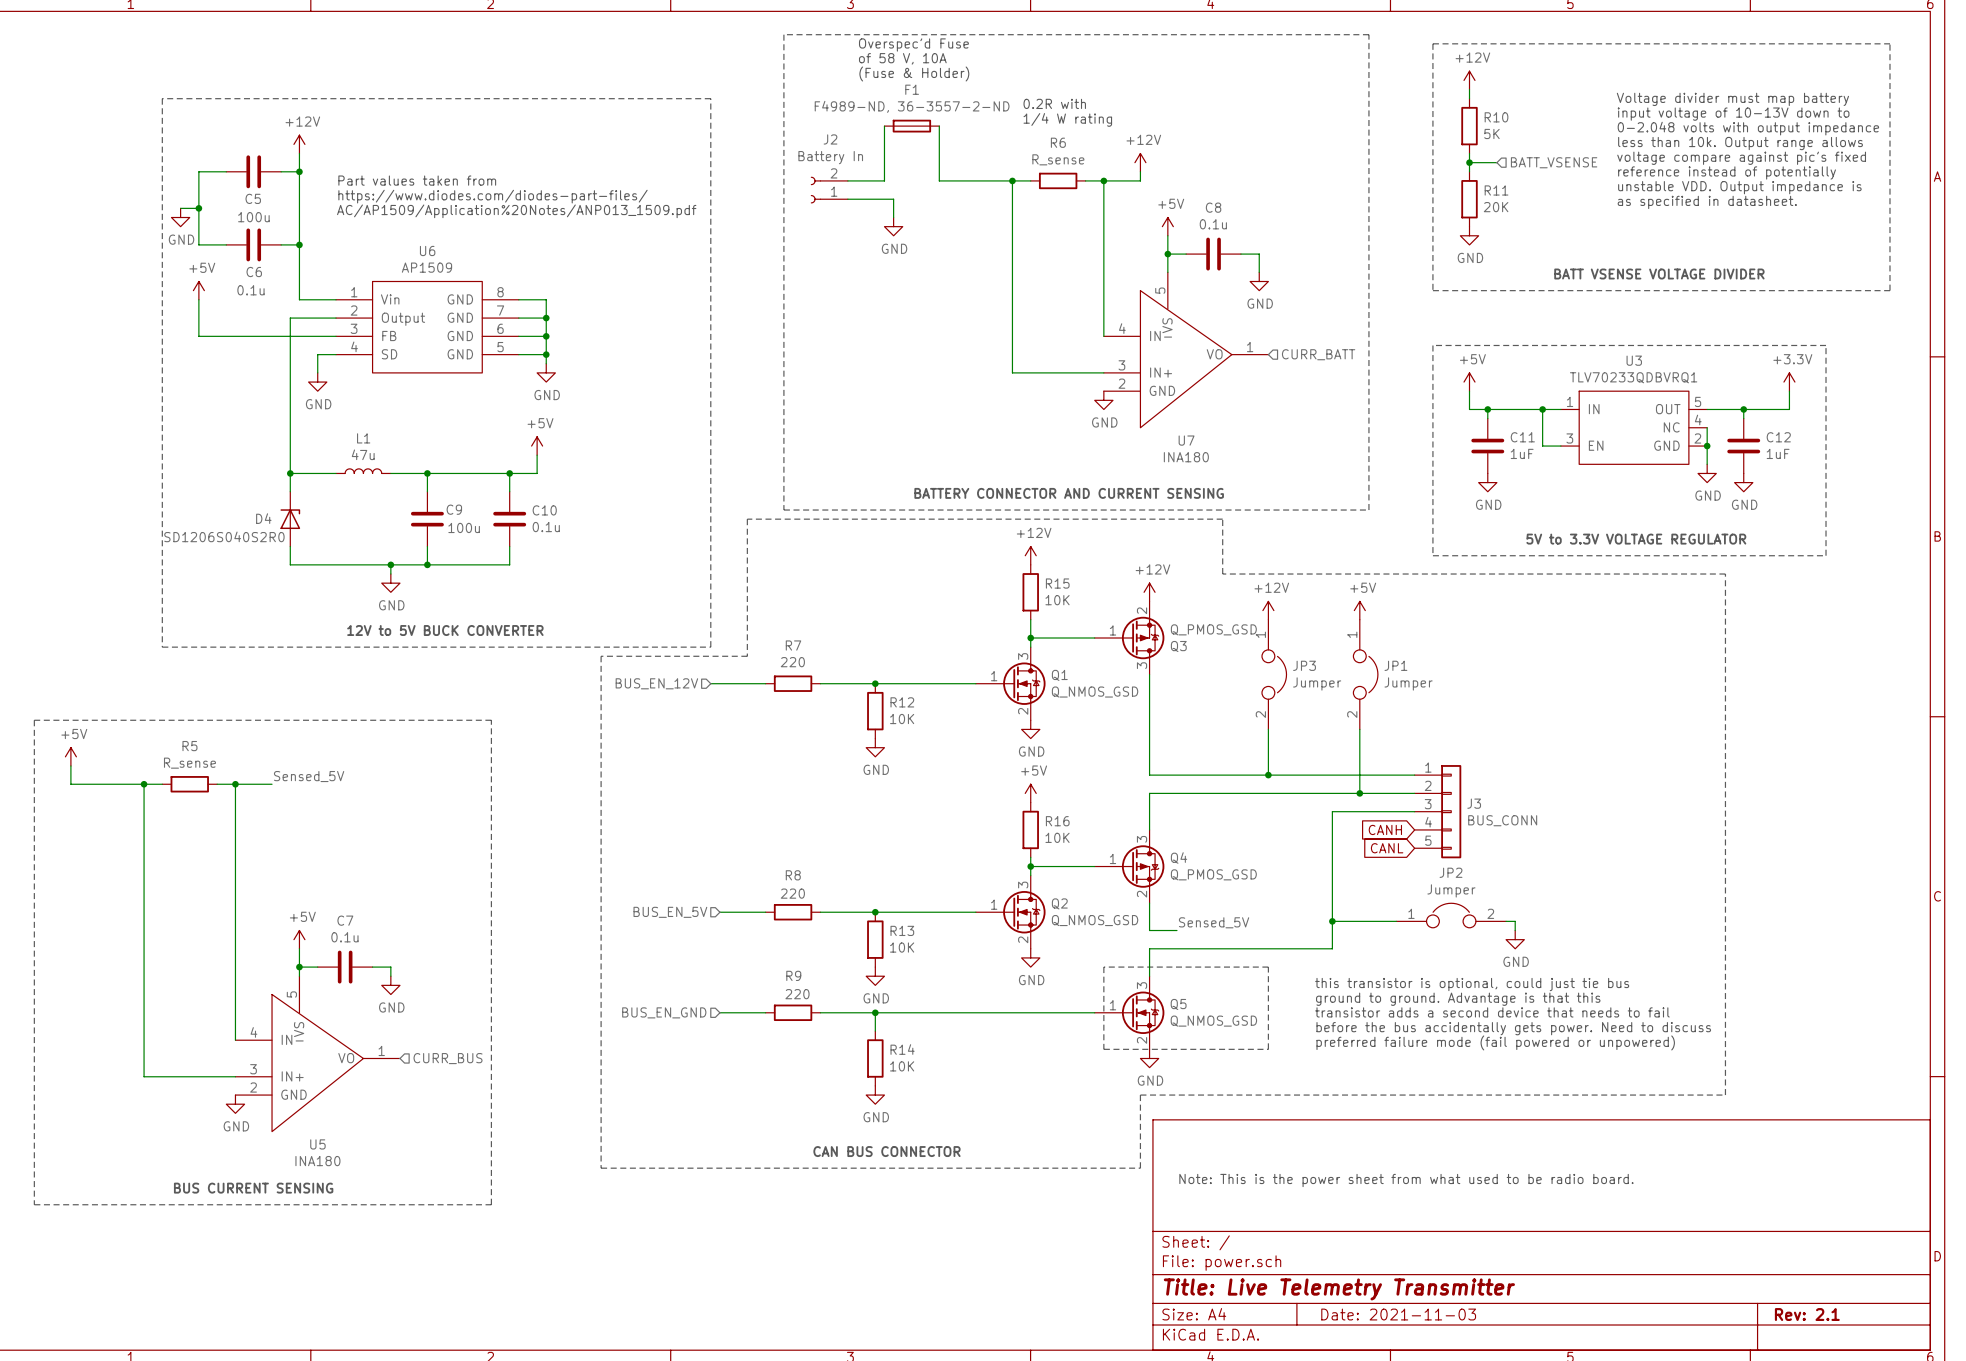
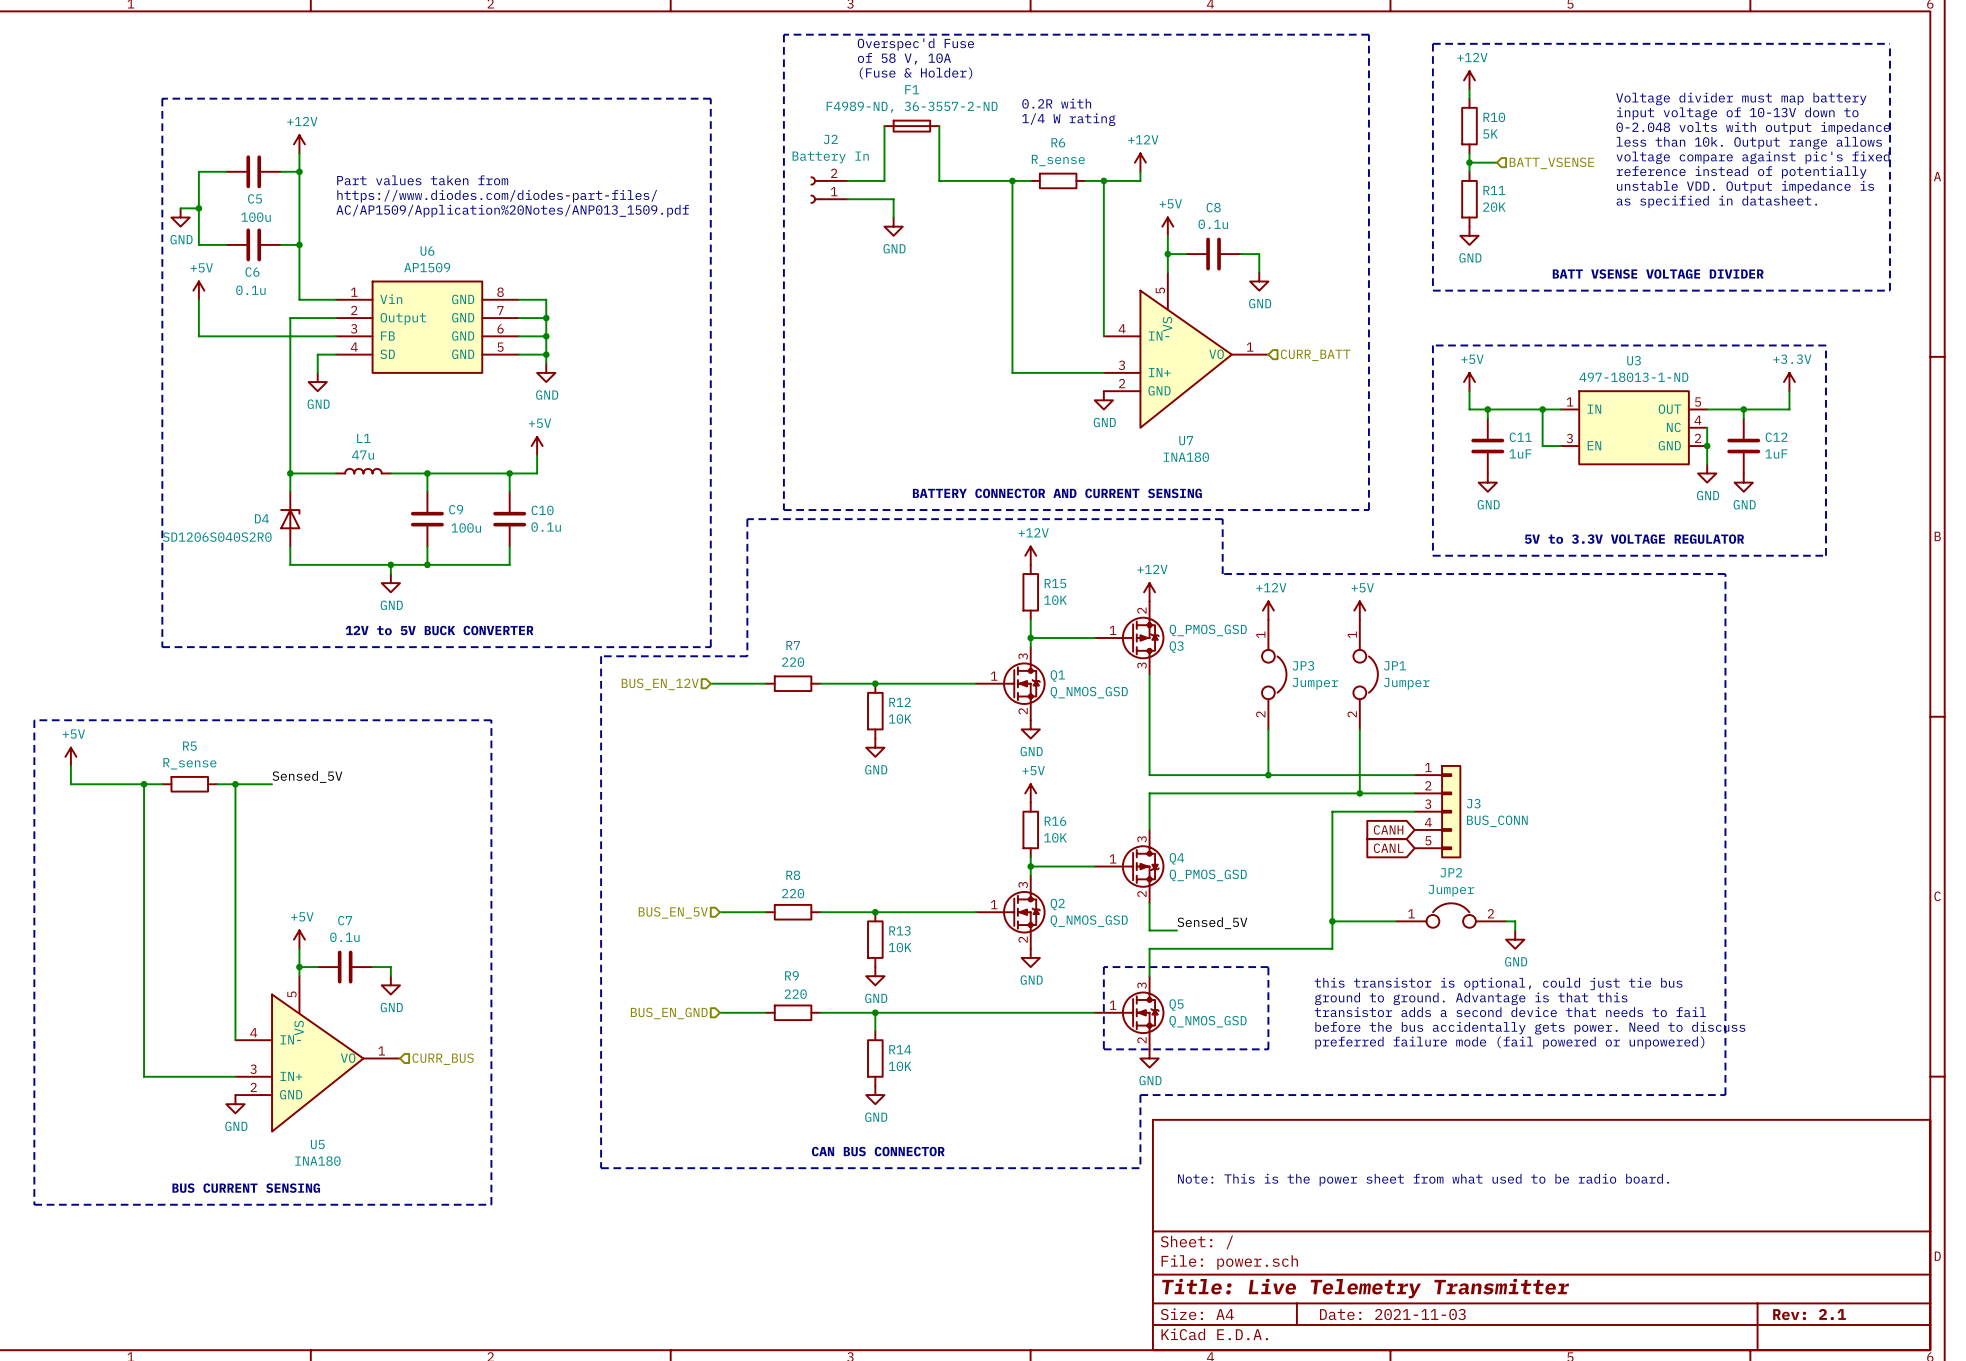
U3 value: TLV70233QDBVRQ1 (1633, 377) -> 497-18013-1-ND (1633, 377)

